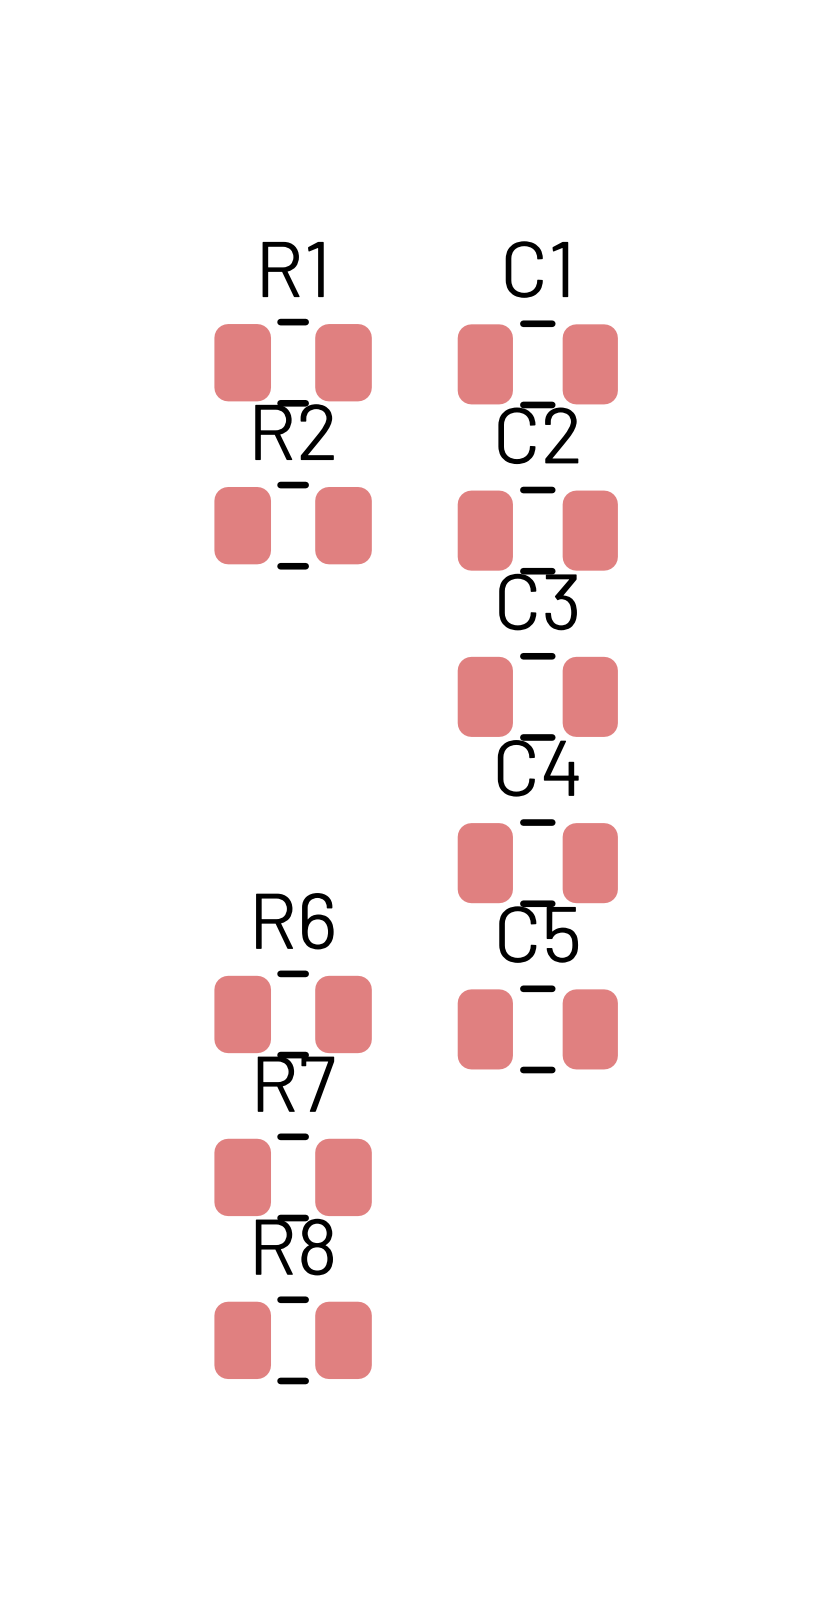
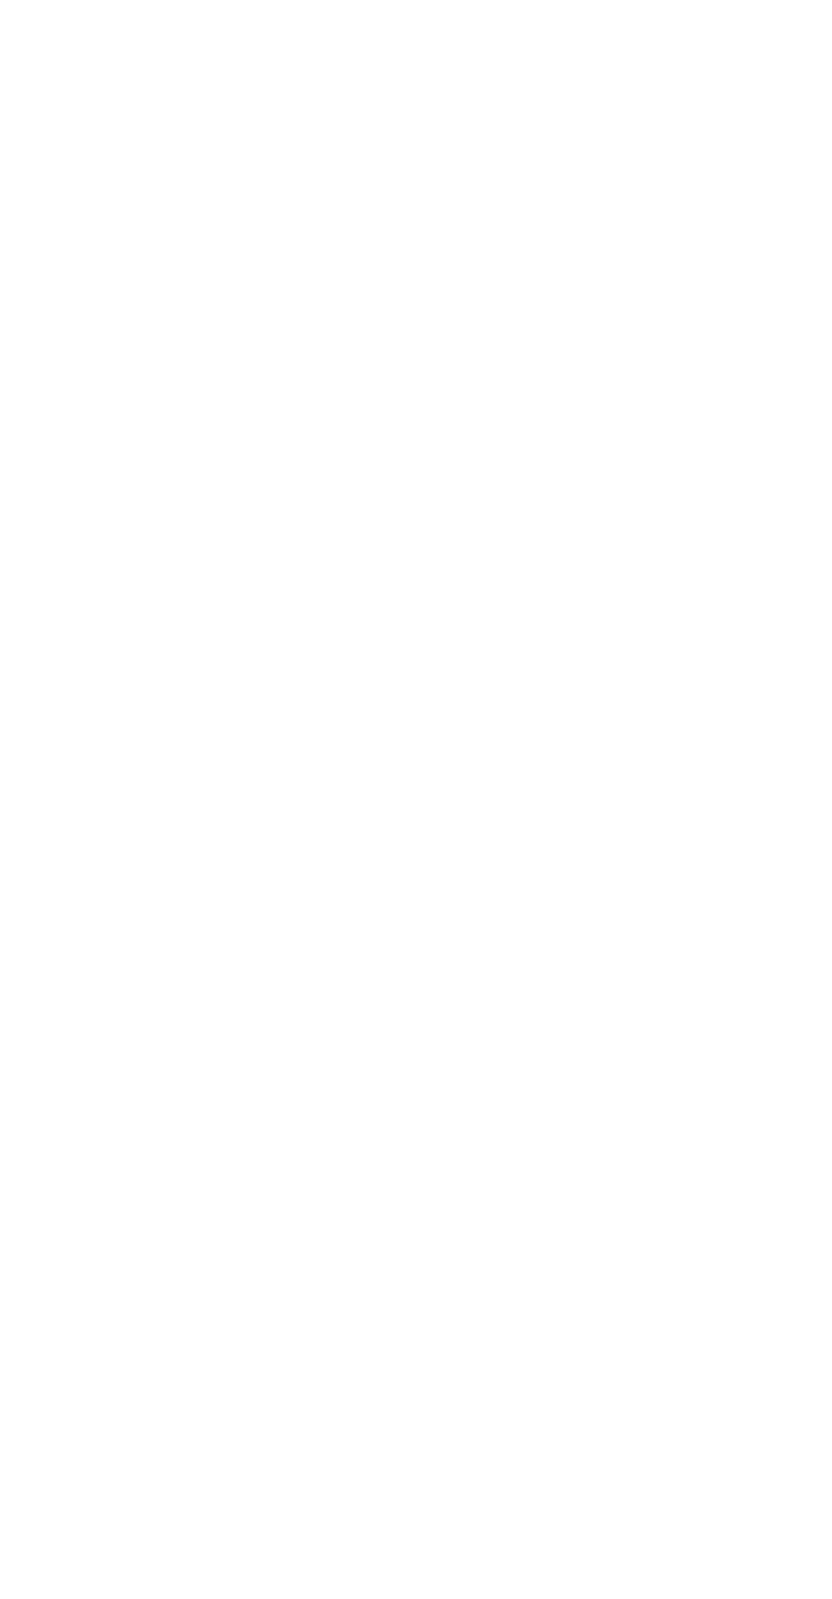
R1: (293, 362) -> none
C1: (537, 364) -> none
R2: (293, 525) -> none
C2: (537, 530) -> none
C3: (537, 696) -> none
C4: (537, 863) -> none
R6: (293, 1014) -> none
C5: (537, 1029) -> none
R7: (293, 1177) -> none
R8: (293, 1340) -> none

